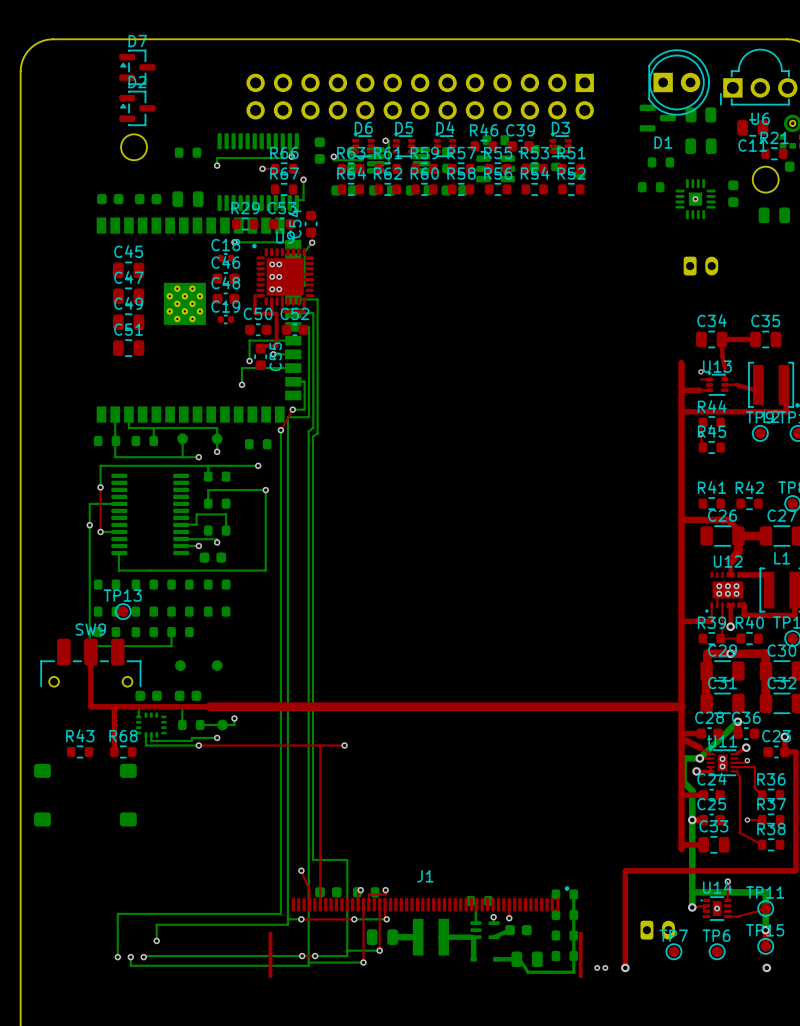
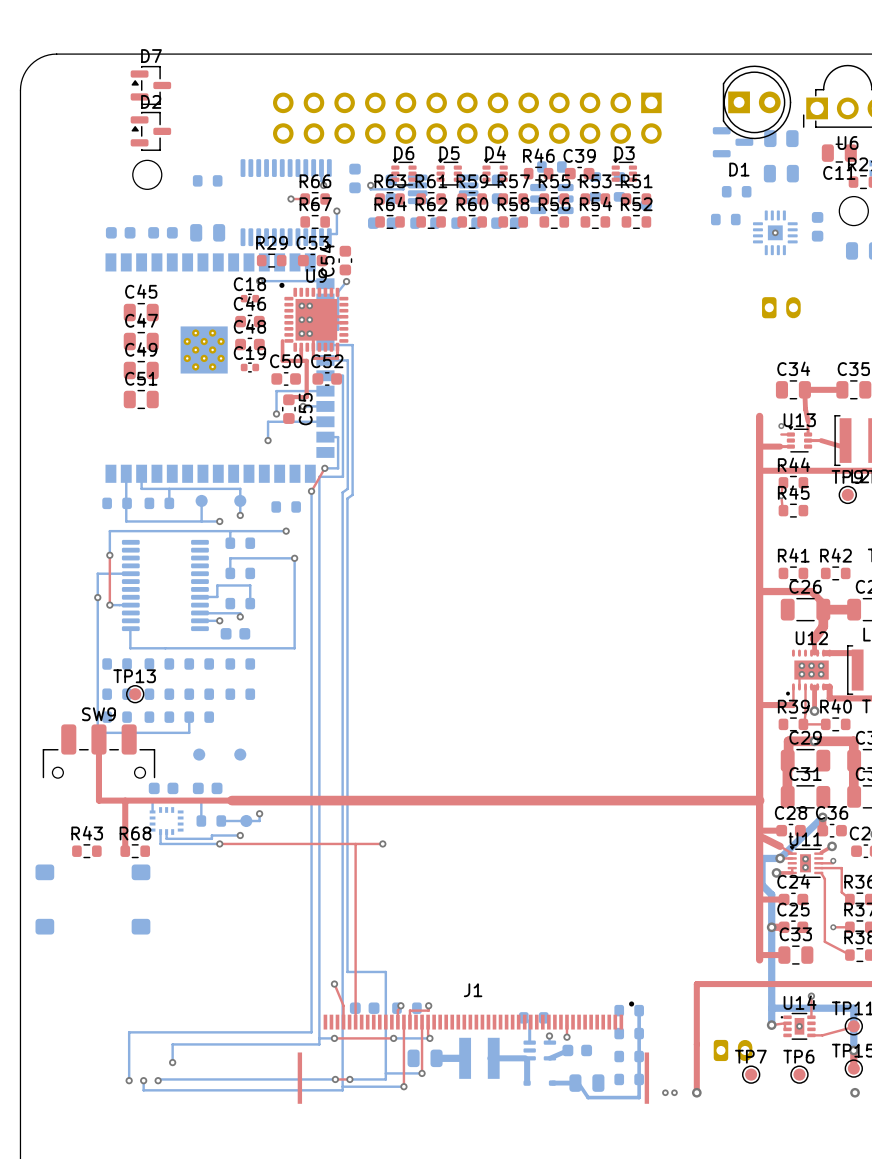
bottom track: (385, 140) (388, 140) (388, 163) (376, 163) -> none
via: (385, 140) -> none
bottom track: (282, 141) (282, 158) (217, 158) (217, 165) -> none
via: (217, 165) -> none

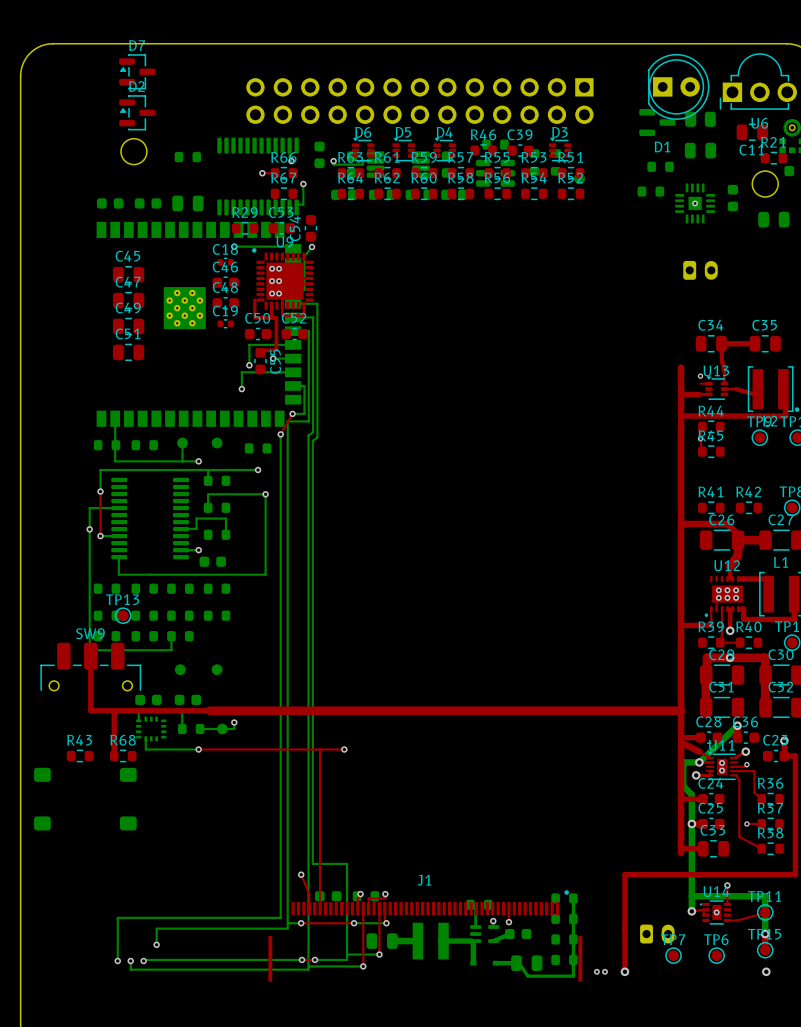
bottom track: (141, 479) (141, 488) (240, 488) (240, 515) -> none
bottom track: (169, 488) (169, 503) -> none
via: (240, 515) -> none
bottom track: (202, 613) (240, 613) (240, 616) -> none
via: (240, 616) -> none
bottom track: (166, 831) (166, 838) (211, 838) (211, 835) (240, 835) -> none
via: (240, 835) -> none

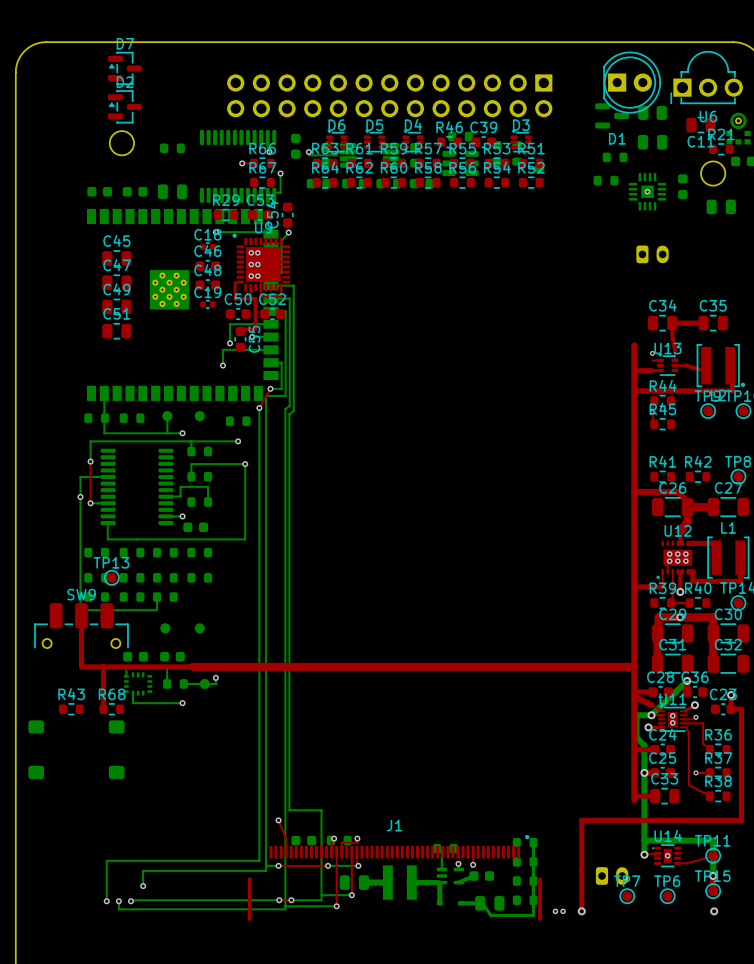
top track: (198, 749) (344, 749) -> none
top track: (320, 749) (320, 911) -> none
via: (344, 749) -> none
top track: (727, 885) (727, 904) -> none
via: (727, 885) -> none

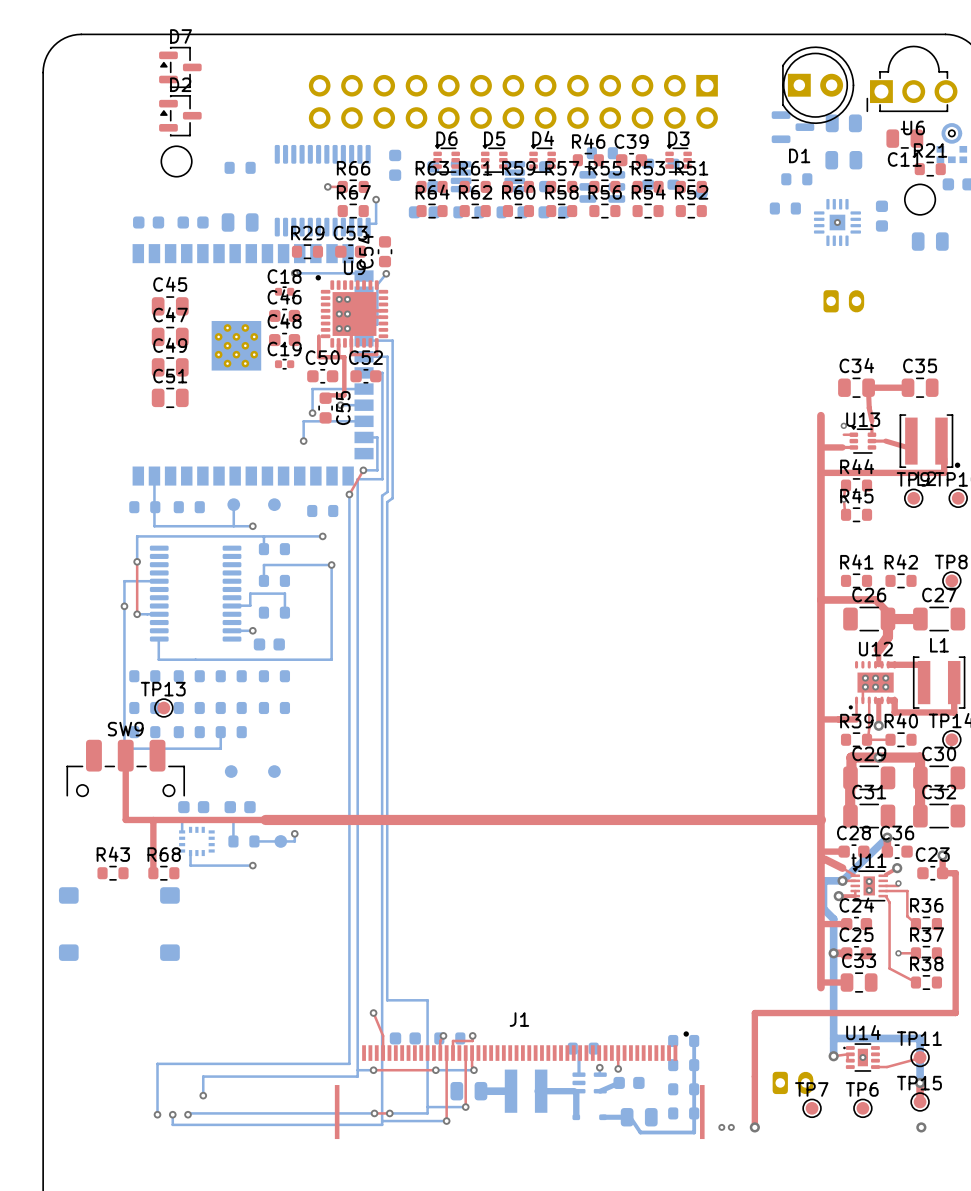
bottom track: (267, 143) (269, 152) -> none
via: (269, 152) -> none
bottom track: (308, 152) (308, 155) (336, 155) (336, 152) (343, 152) -> none
via: (308, 152) -> none

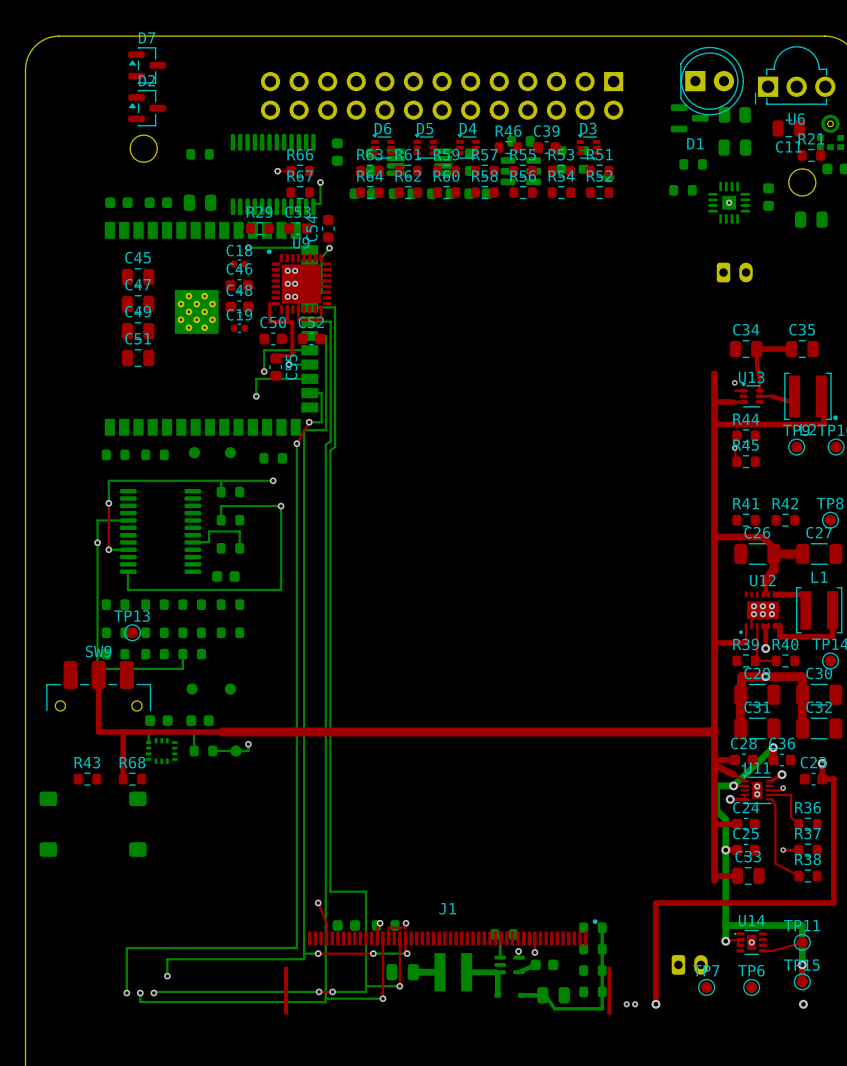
bottom track: (154, 481) (154, 526) (252, 526) -> none
bottom track: (233, 509) (233, 526) -> none
via: (252, 526) -> none
bottom track: (241, 630) (252, 630) -> none
via: (252, 630) -> none
bottom track: (190, 852) (190, 865) (252, 865) -> none
via: (252, 865) -> none

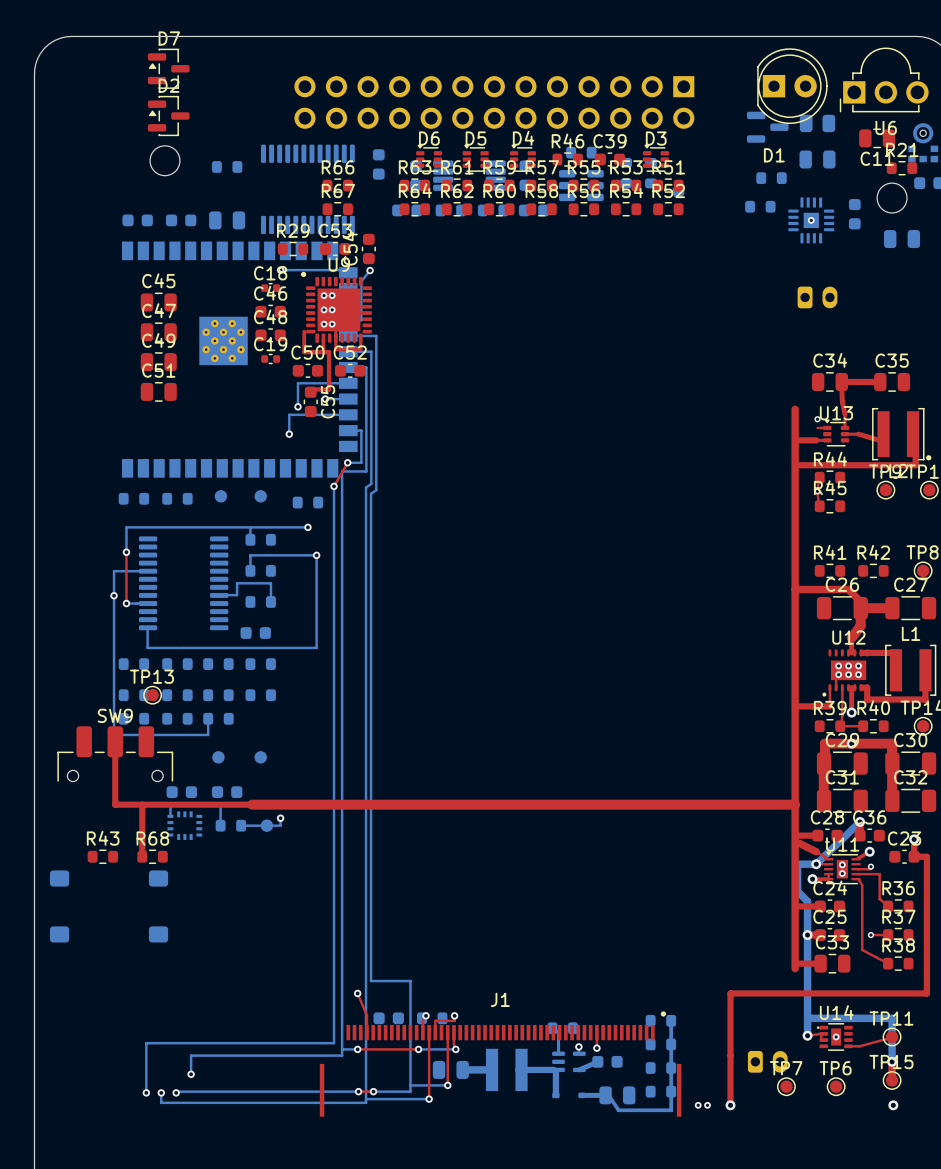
top track: (277, 171) (290, 171) -> none
via: (277, 171) -> none
bottom track: (320, 182) (320, 203) (313, 203) -> none
via: (320, 182) -> none

